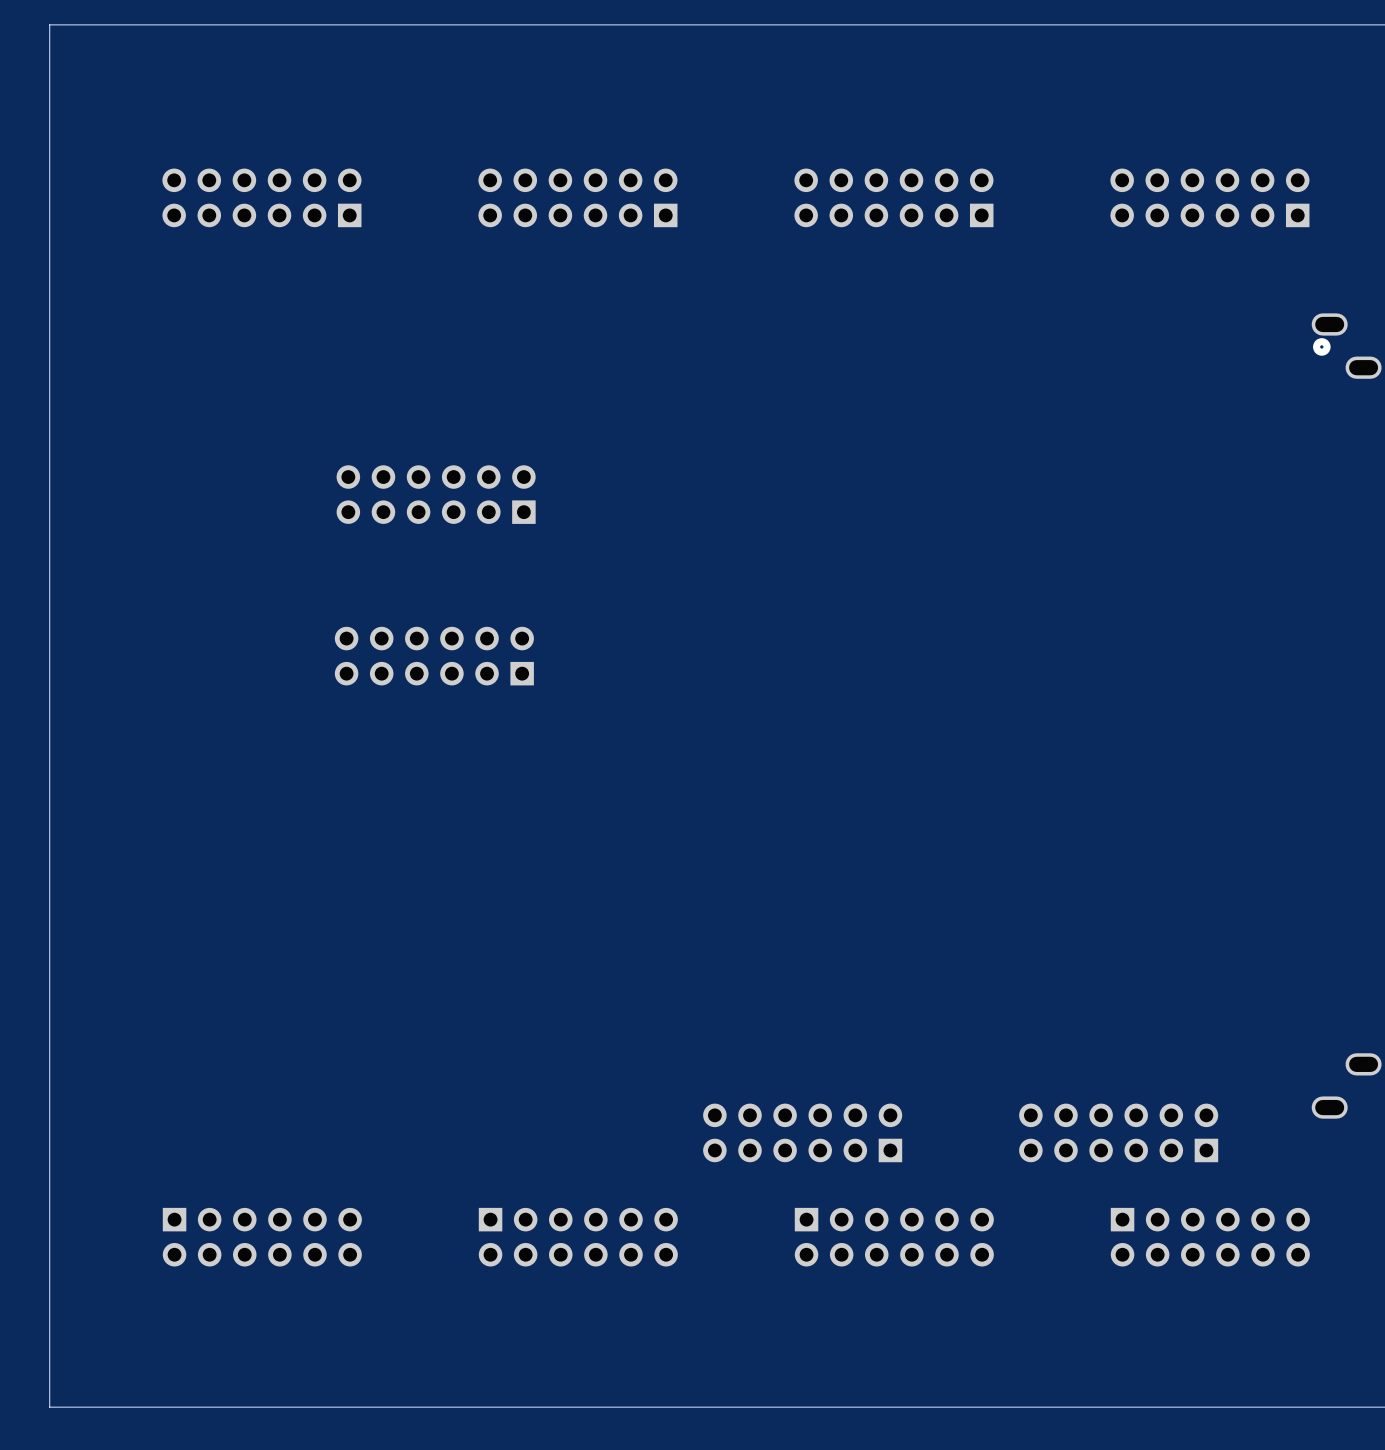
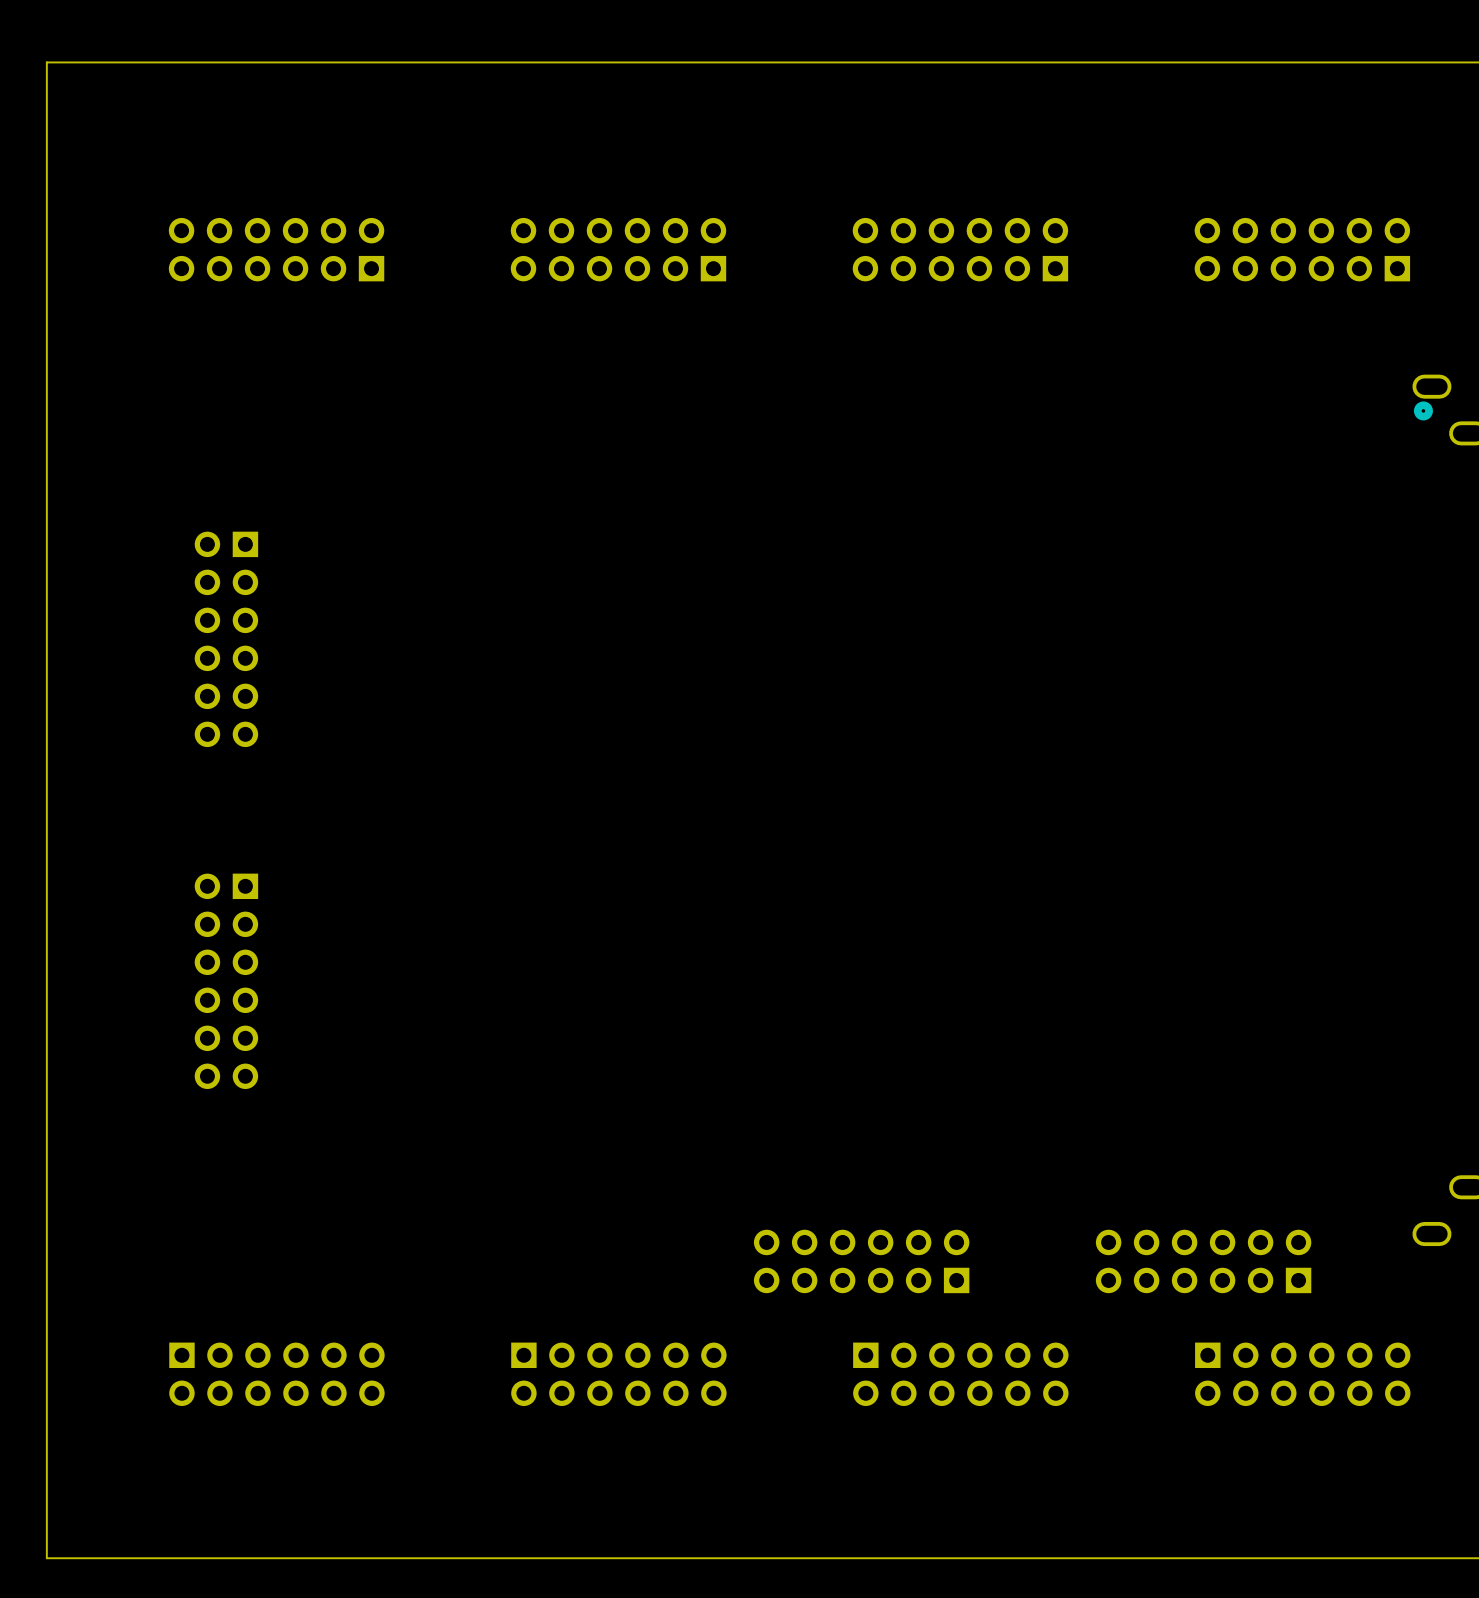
part: (436, 494) -> none
part: none -> (226, 639)
part: (434, 656) -> none
part: none -> (226, 981)

